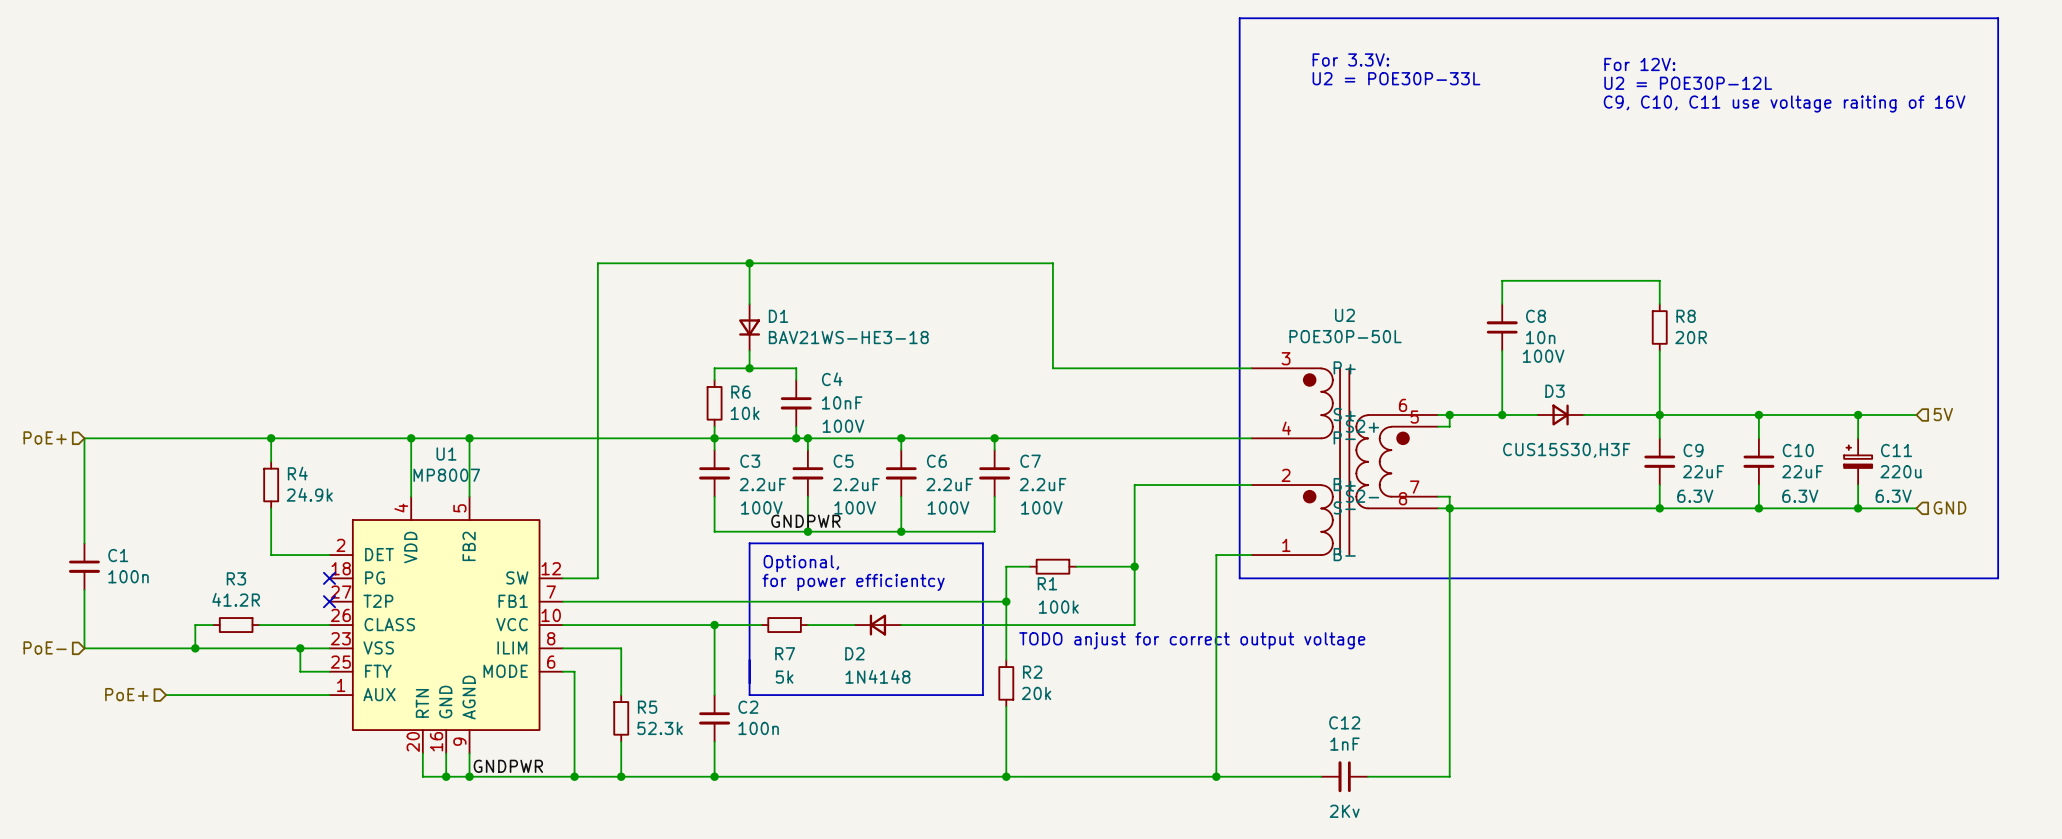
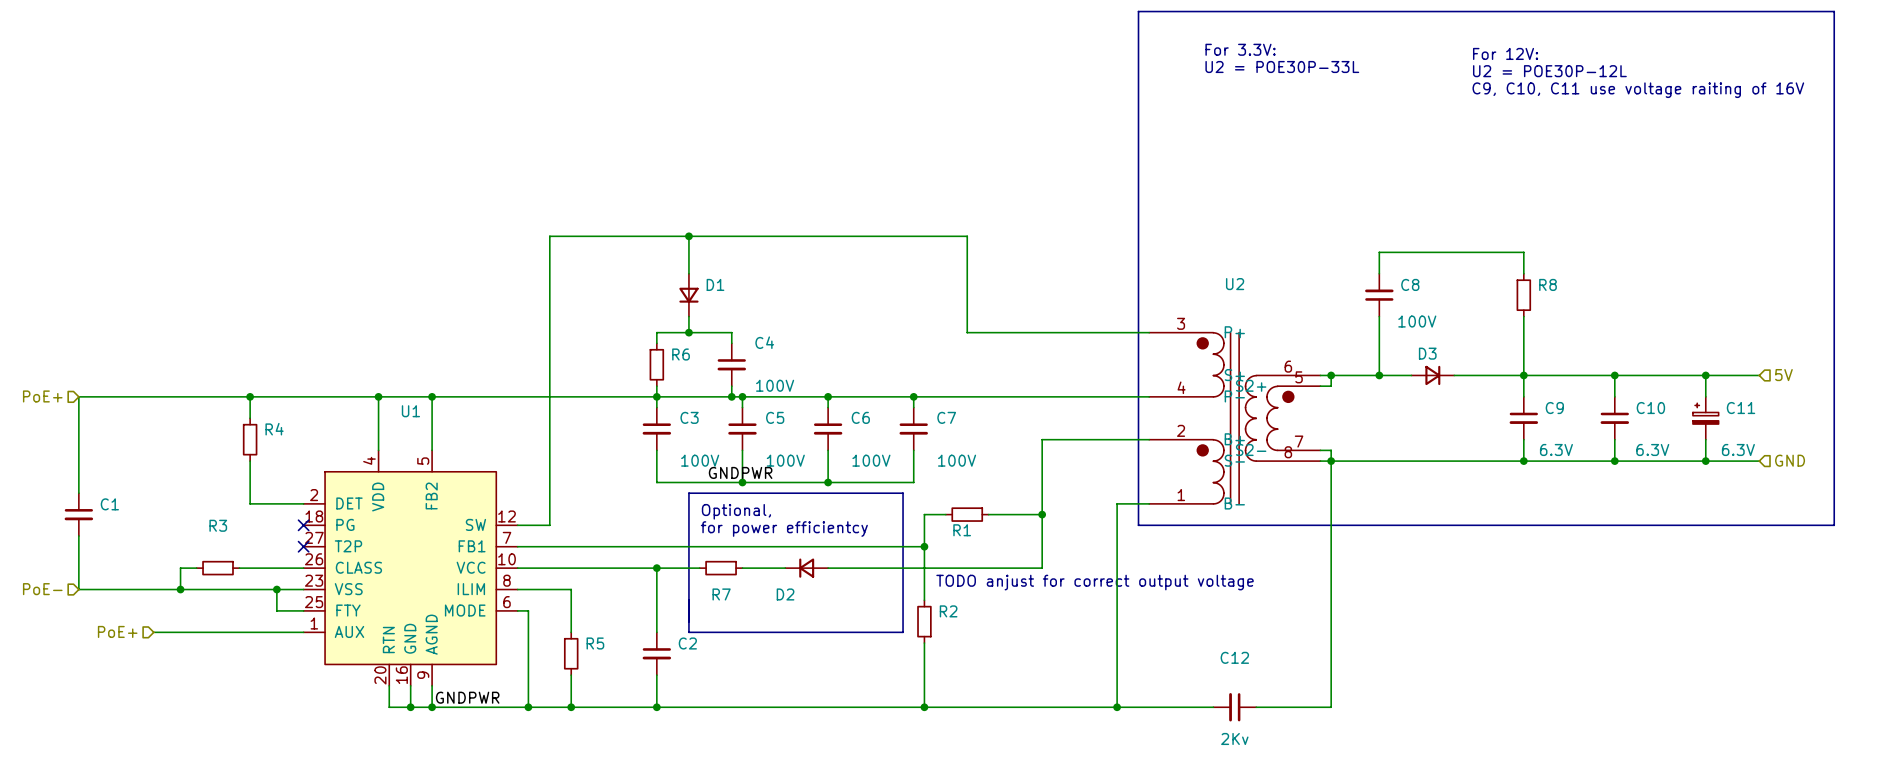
U2 value: POE30P-50L (1345, 336) -> none
D1 value: BAV21WS-HE3-18 (848, 337) -> none
C8 value: 10n (1540, 337) -> none
R8 value: 20R (1691, 337) -> none
C4 value: 10nF (842, 402) -> none
R6 value: 10k (745, 413) -> none
D3 value: CUS15S30,H3F (1566, 450) -> none
C9 value: 22uF (1703, 471) -> none
C10 value: 22uF (1802, 471) -> none
C11 value: 220u (1900, 471) -> none
U1 value: MP8007 (446, 475) -> none
C3 value: 2.2uF (763, 484) -> none
C5 value: 2.2uF (856, 484) -> none
C6 value: 2.2uF (949, 484) -> none
C7 value: 2.2uF (1043, 484) -> none
R4 value: 24.9k (309, 494) -> none
C1 value: 100n (128, 576) -> none
R3 value: 41.2R (236, 599) -> none
R1 value: 100k (1058, 607) -> none
D2 value: 1N4148 (877, 676) -> none
R7 value: 5k (784, 677) -> none
R2 value: 20k (1036, 693) -> none
R5 value: 52.3k (660, 728) -> none
C2 value: 100n (758, 728) -> none
C12 value: 1nF (1344, 744) -> none

